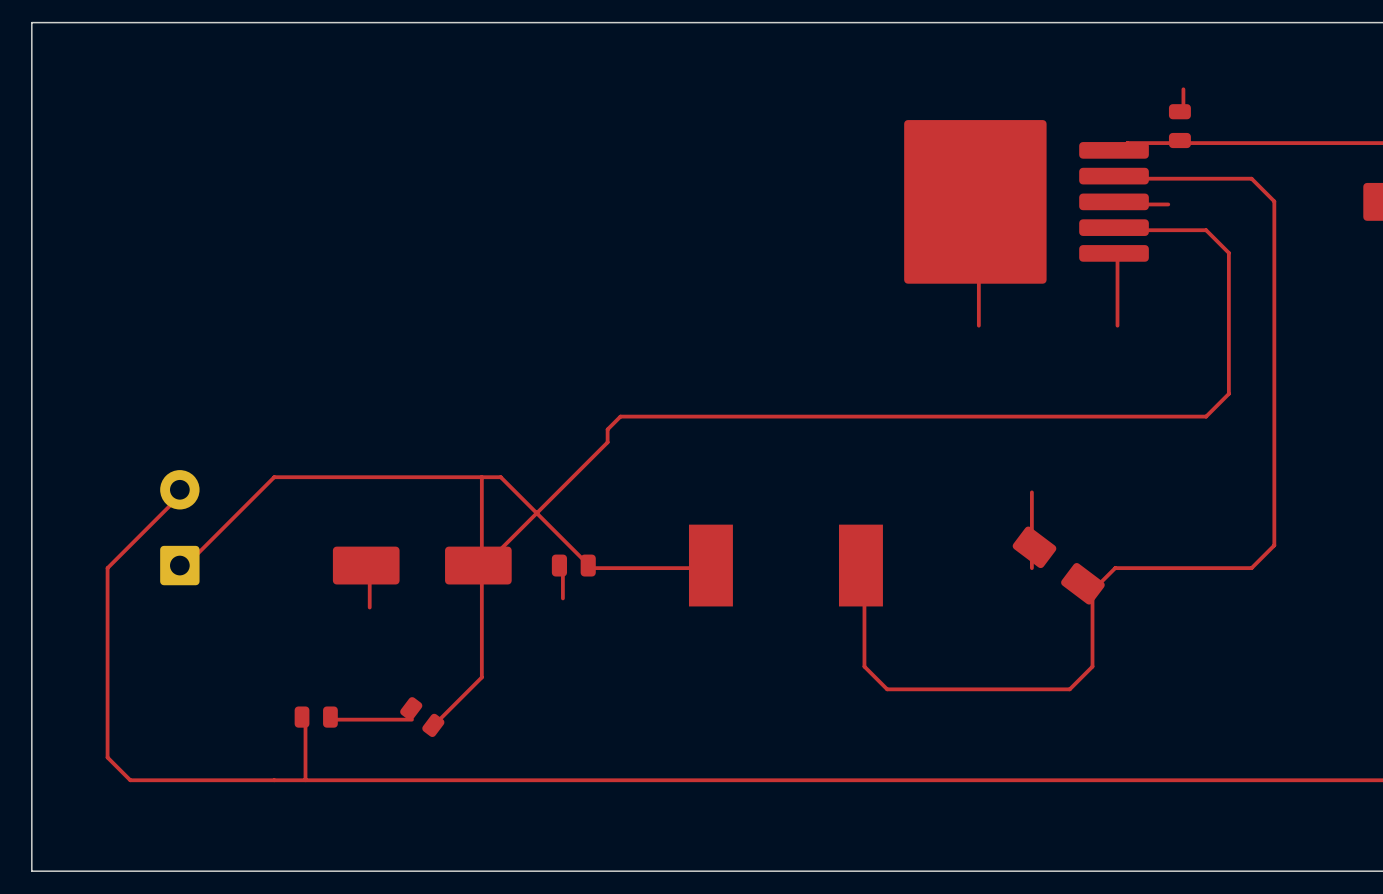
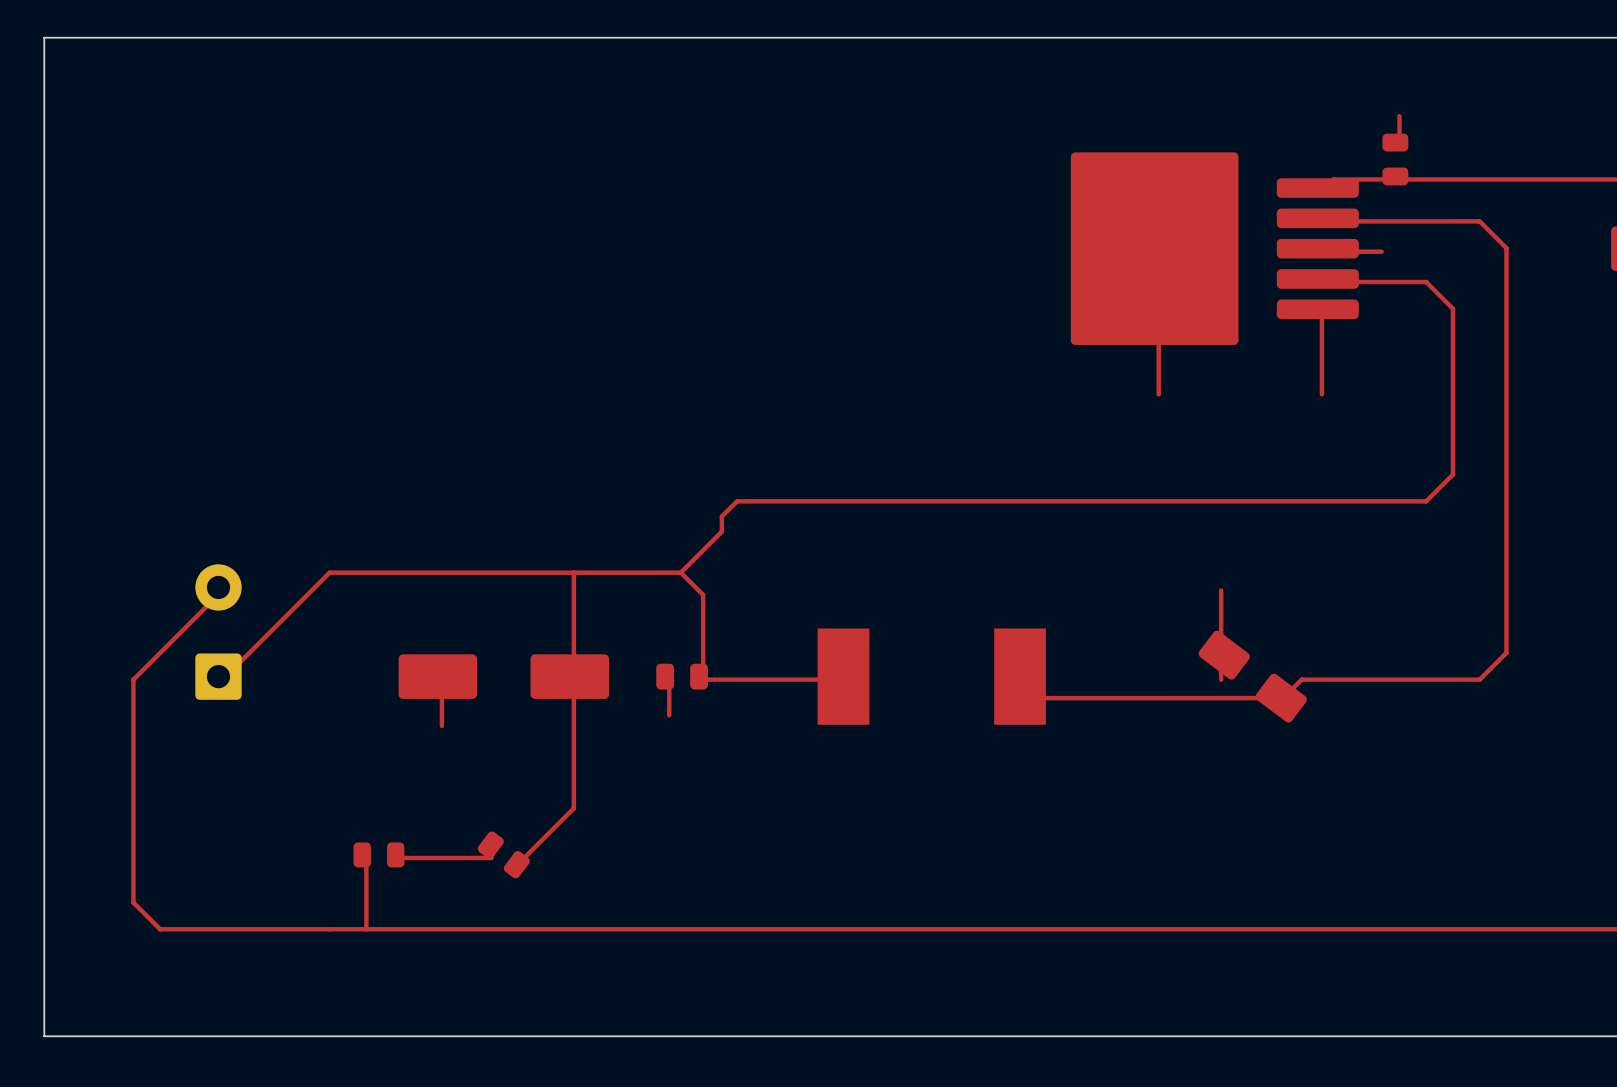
top track: (500, 477) (591, 568) -> (596, 572) (680, 572) (703, 594) (703, 679)
top track: (572, 477) (481, 568) -> none
top track: (1115, 568) (1092, 590) (1092, 666) (1069, 689) (887, 689) (864, 666) (864, 568) -> (1319, 679) (1301, 679) (1283, 698) (1042, 698) (1024, 679)

